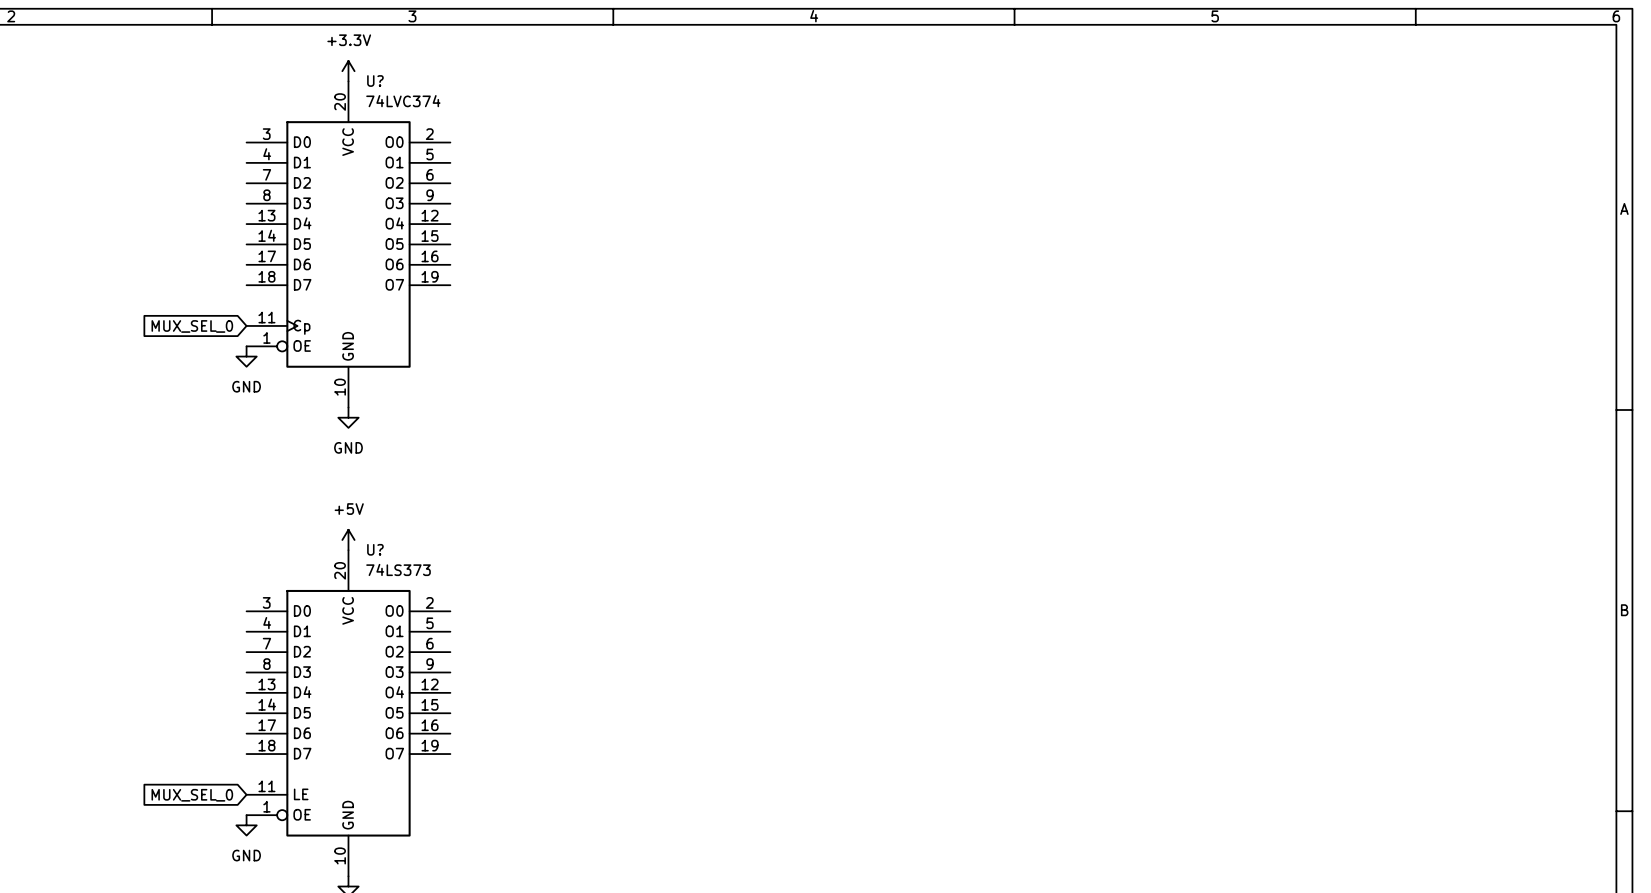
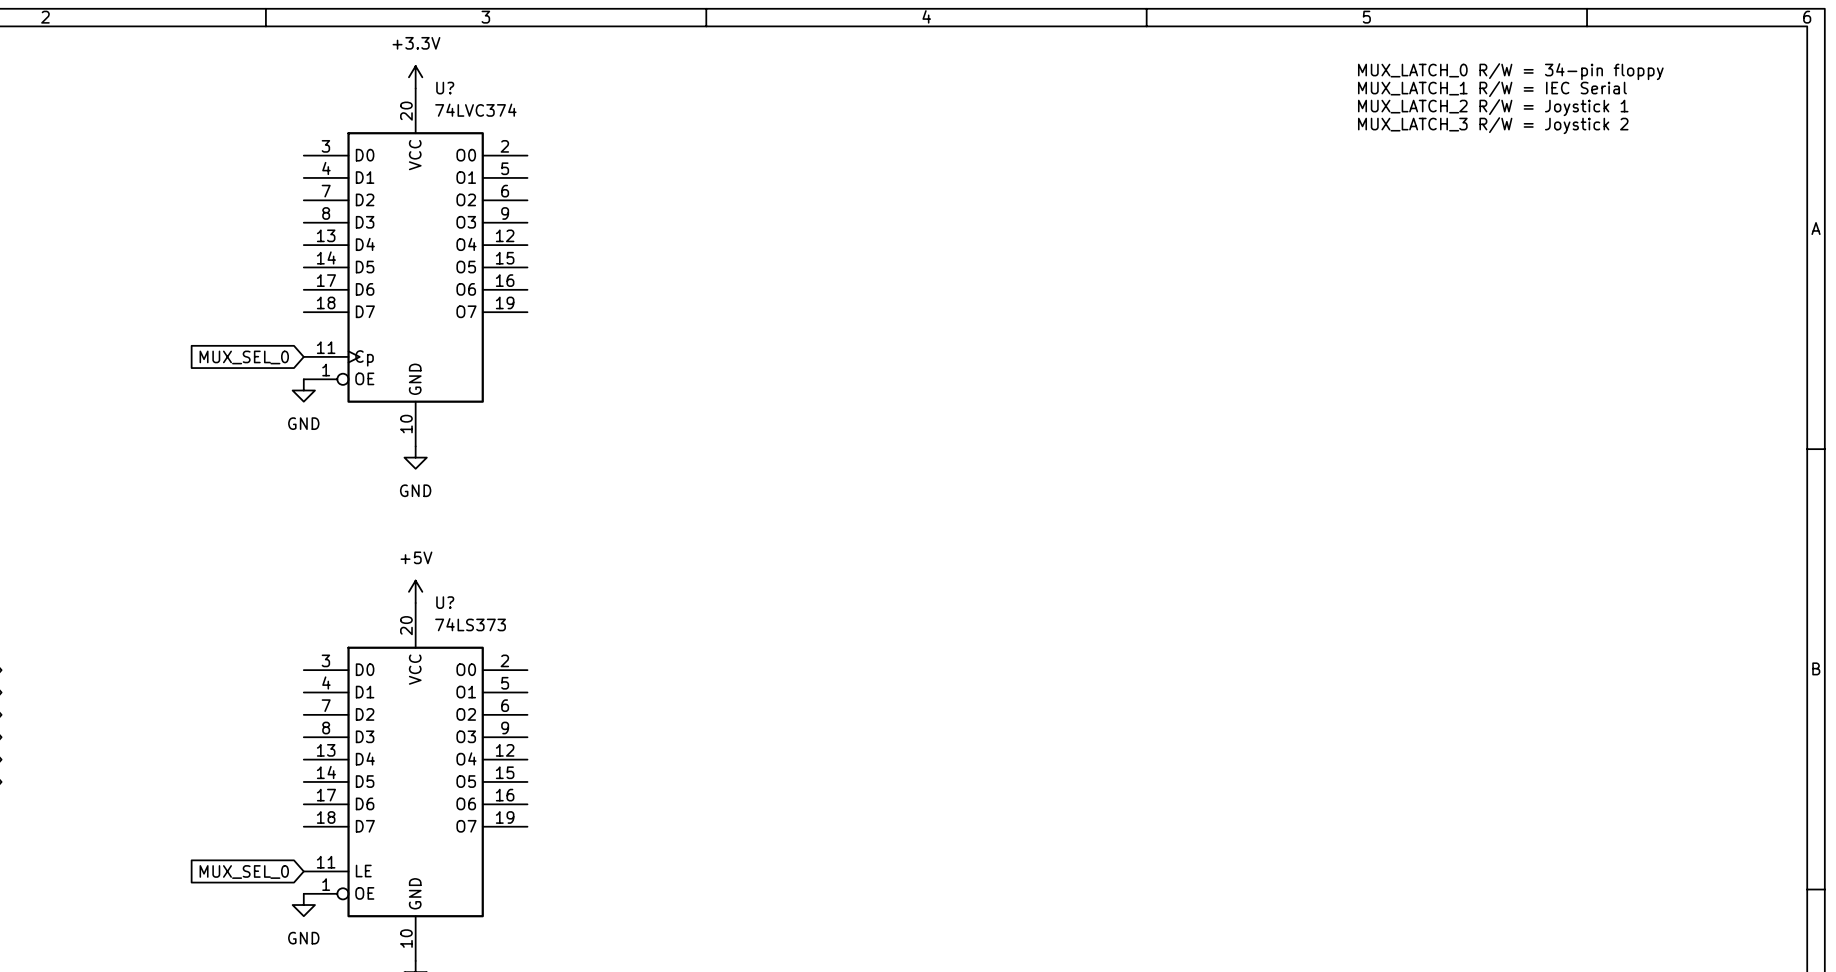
text: none -> MUX_LATCH_0 R/W = 34-pin floppy (1510, 71)
text: none -> MUX_LATCH_1 R/W = IEC Serial (1492, 89)
text: none -> MUX_LATCH_2 R/W = Joystick 1 (1493, 107)
text: none -> MUX_LATCH_3 R/W = Joystick 2 (1493, 125)

